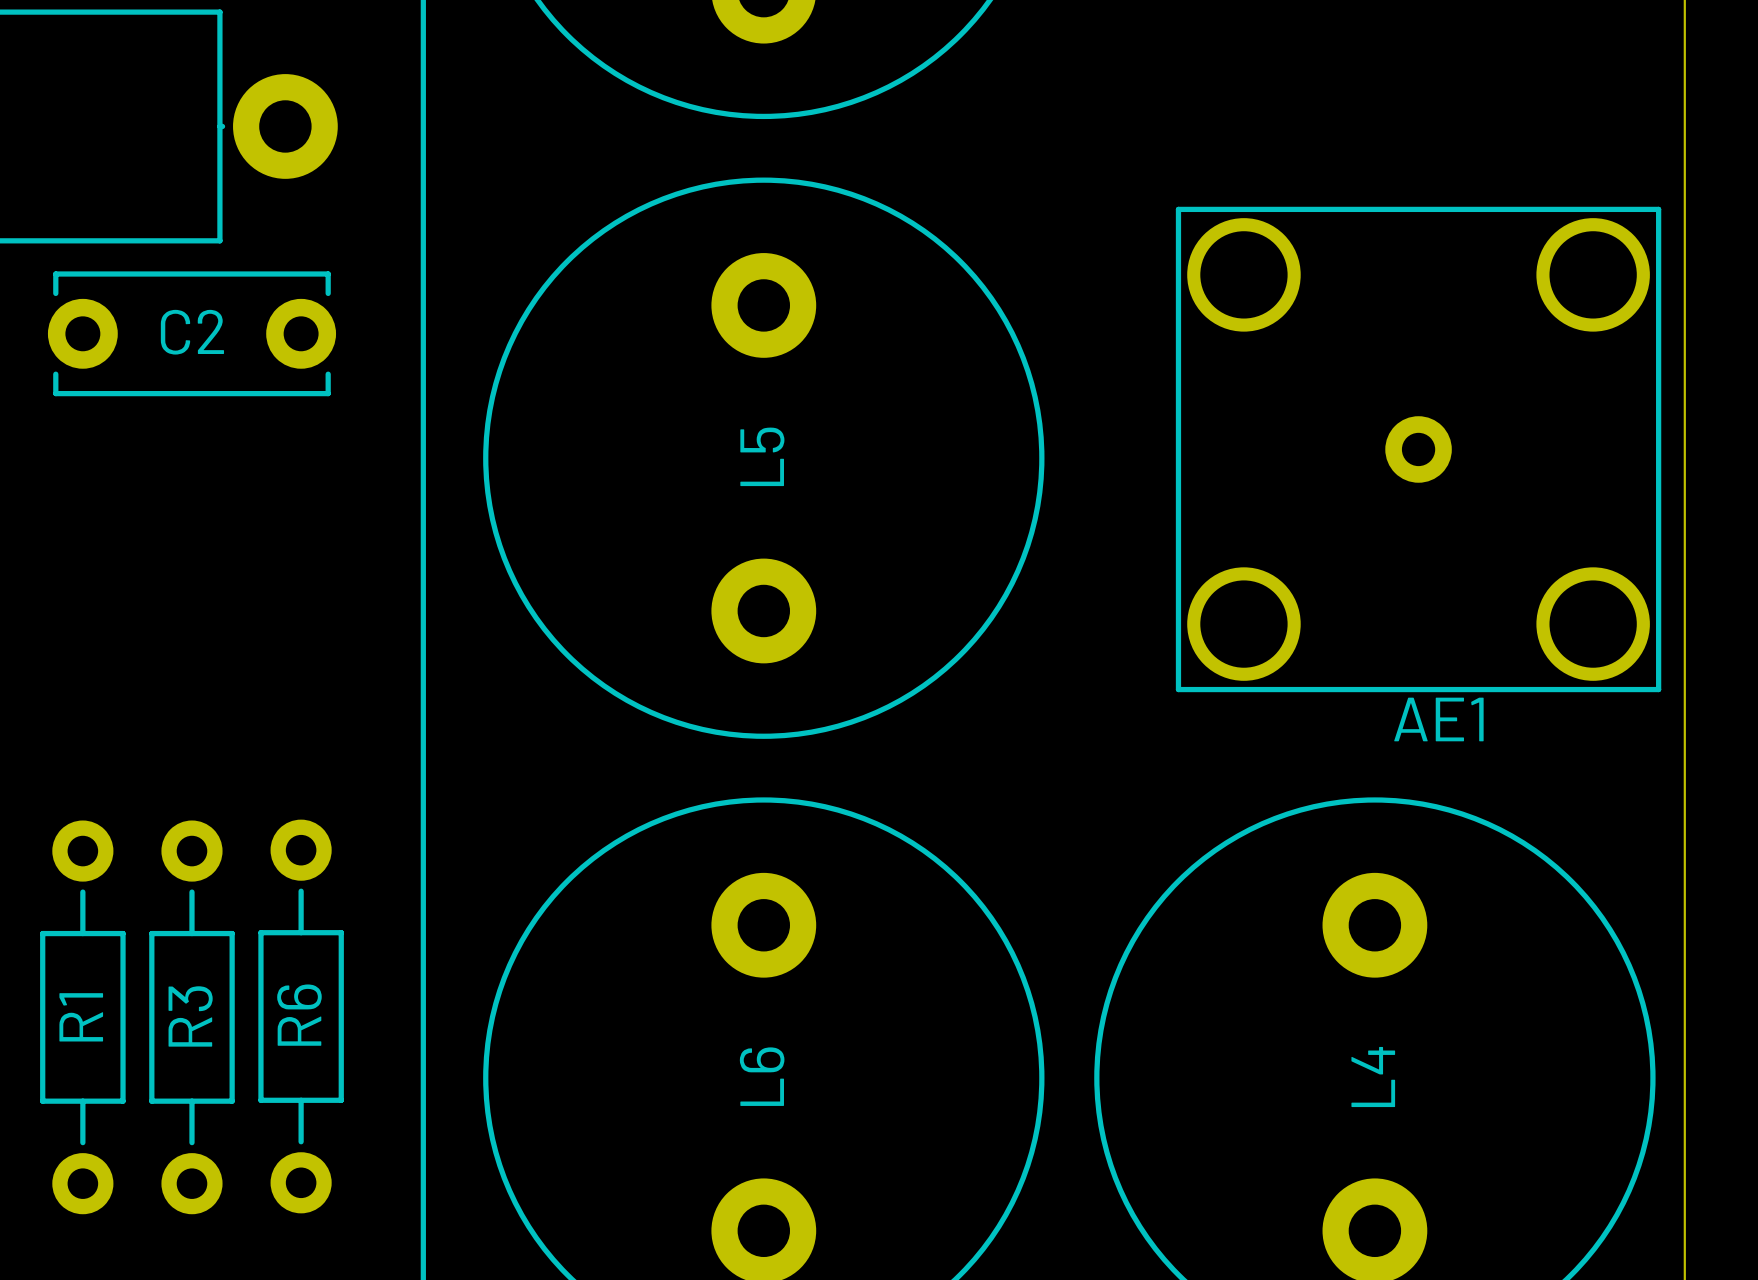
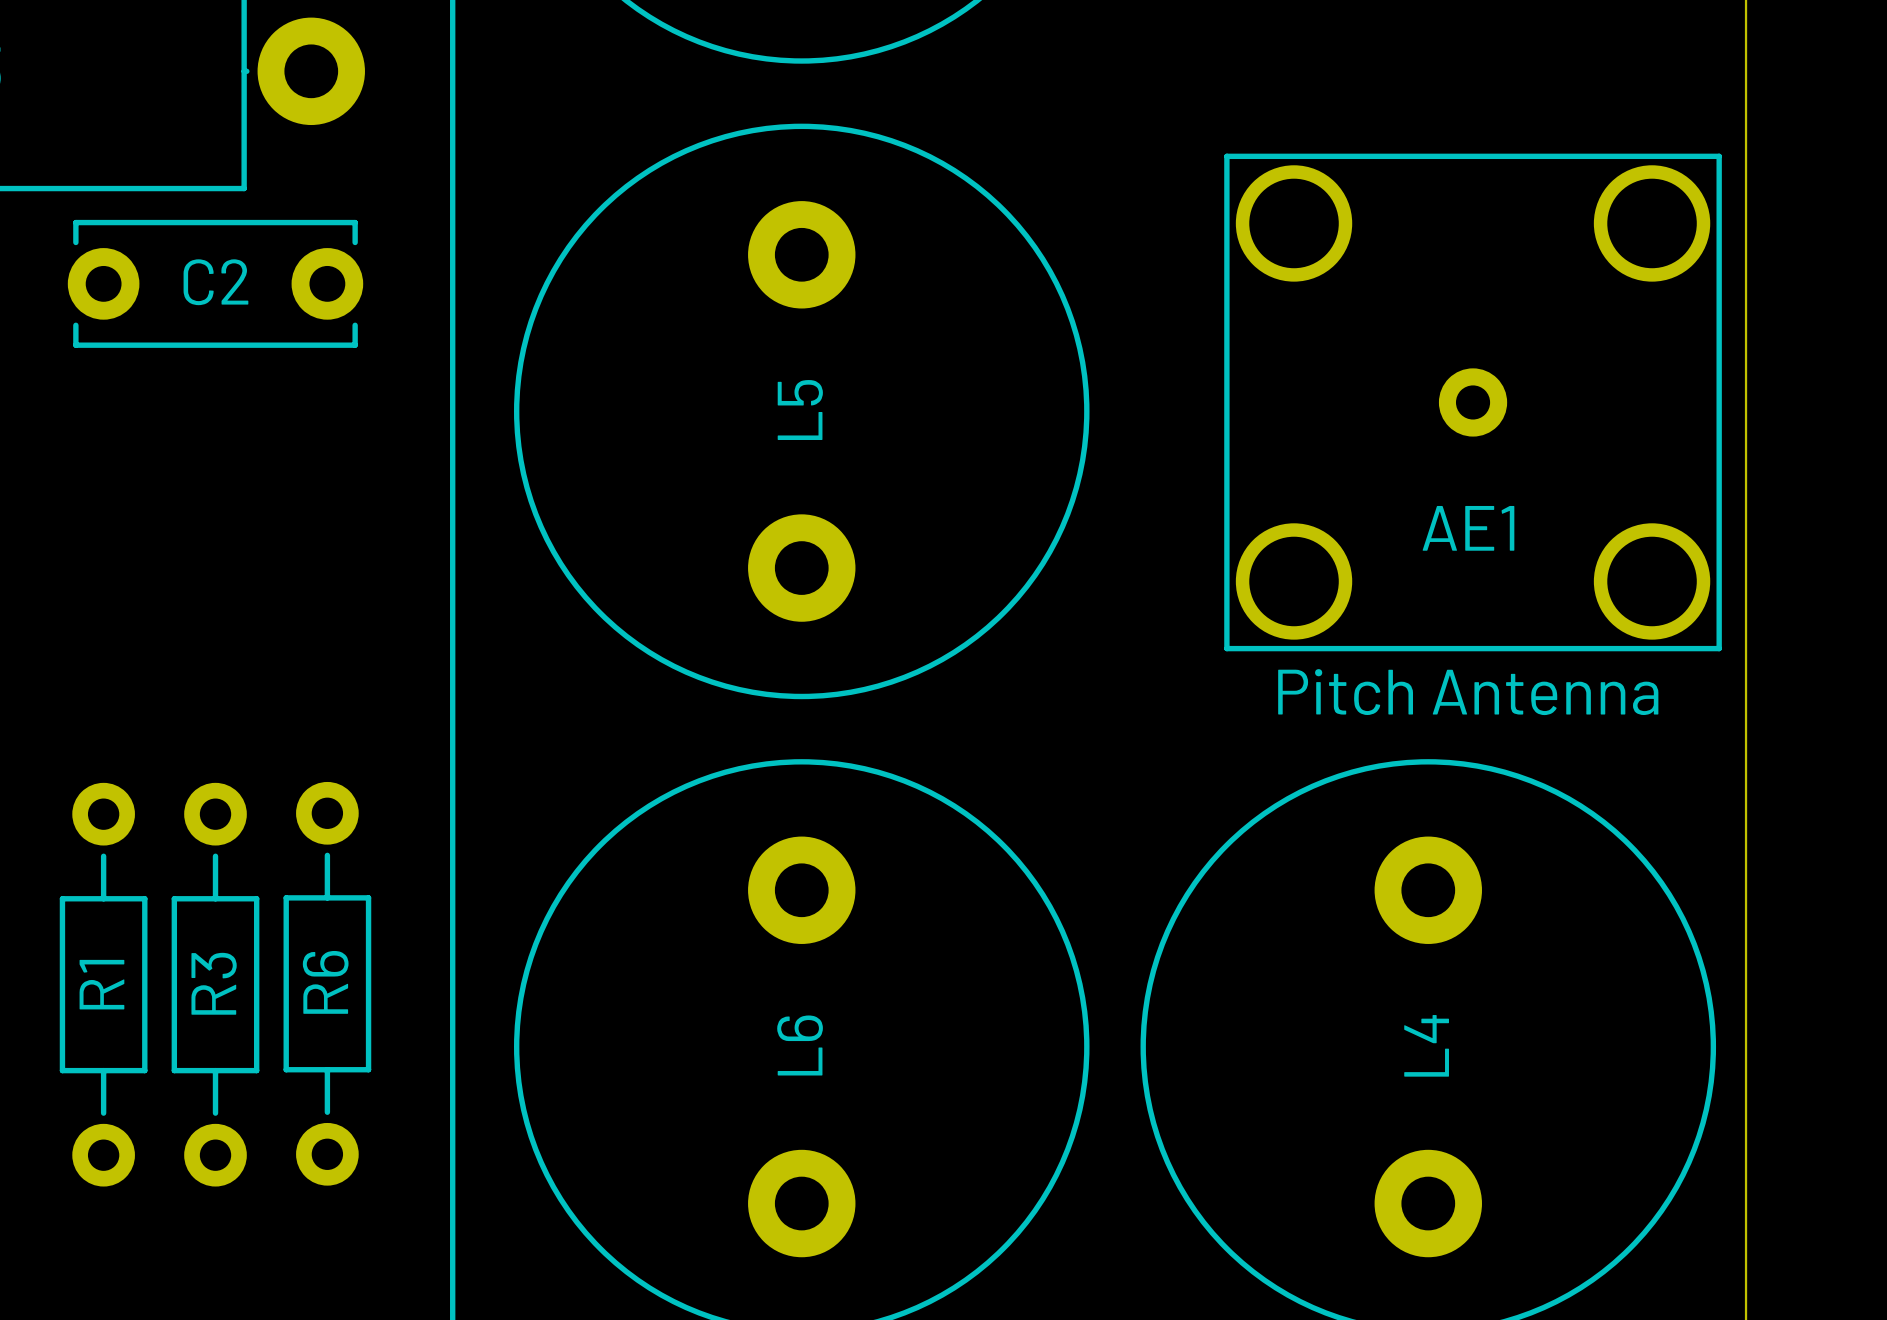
AE1 name position: AE1 (1438, 719) -> AE1 (1468, 528)
text: none -> Pitch Antenna (1468, 692)

